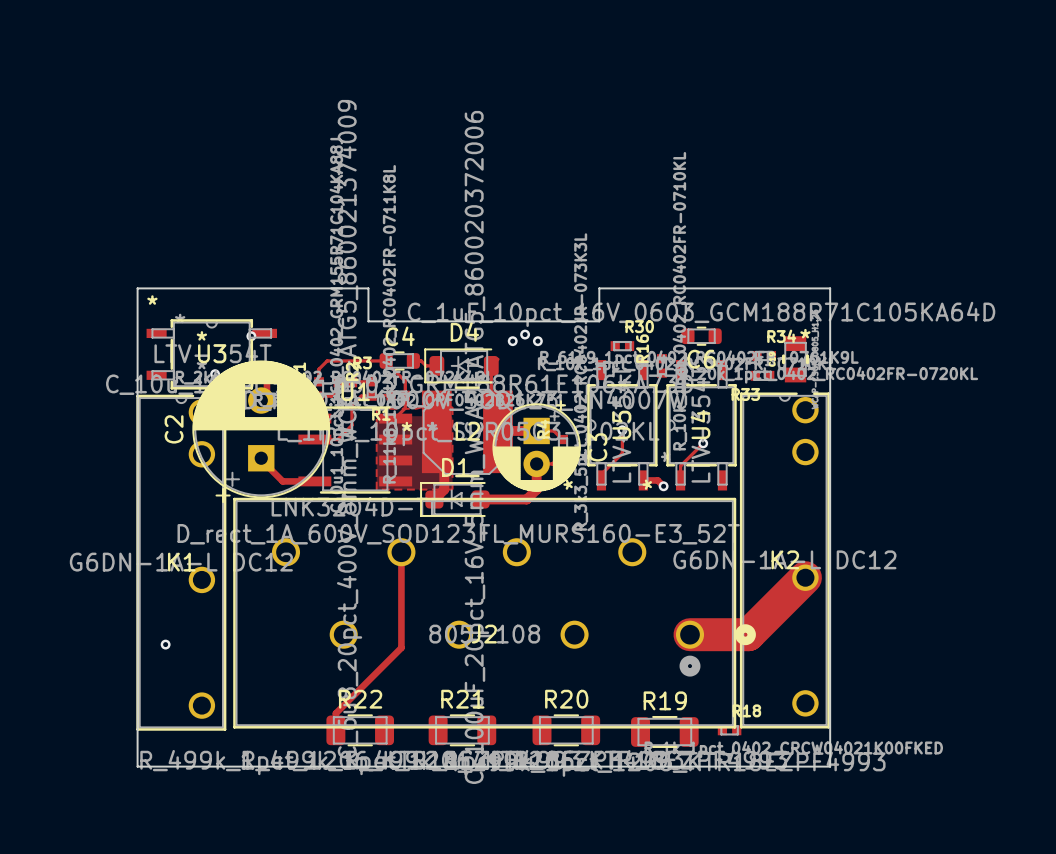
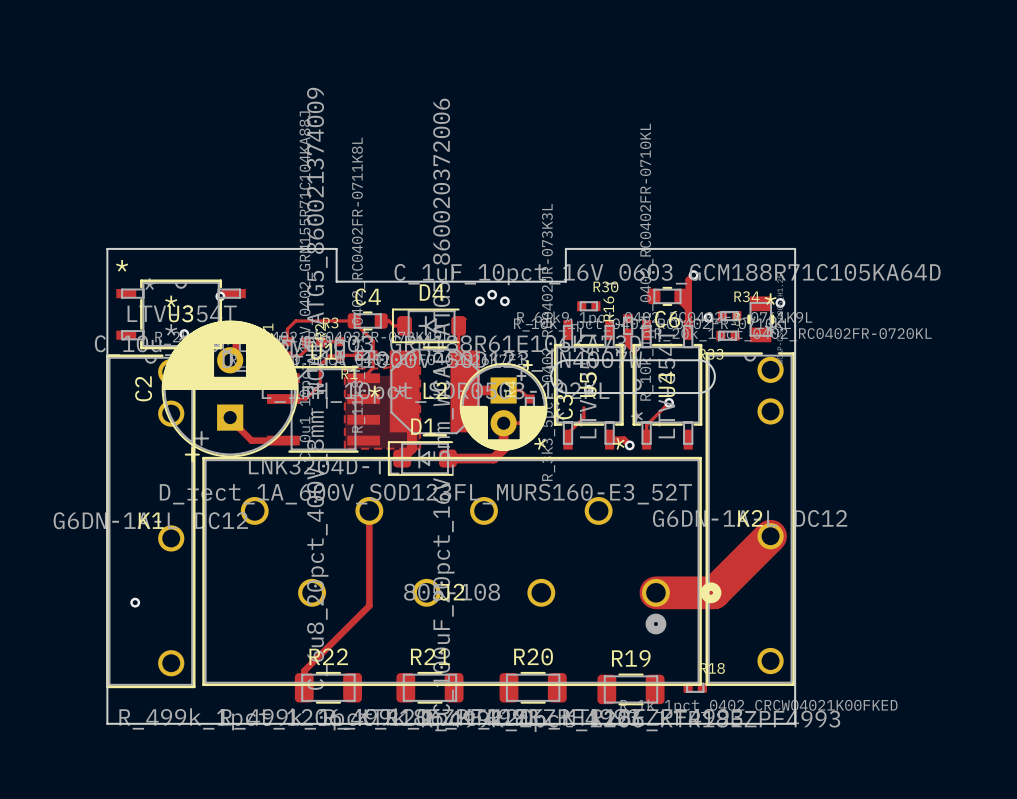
track: none -> (693, 275) (688, 280) (688, 330) (688, 308) (680, 301)
via: none -> (693, 275)
via: none -> (780, 302)
via: none -> (708, 317)
track: none -> (628, 333) (628, 343) (634, 350)
board edge: none -> (567, 360) (700, 360) (710, 365) (714, 378) (710, 387) (700, 392) (565, 392) (555, 388) (551, 376) (555, 365) (567, 360)
track: (622, 430) (622, 453) (617, 458) -> (583, 407) (583, 417)

